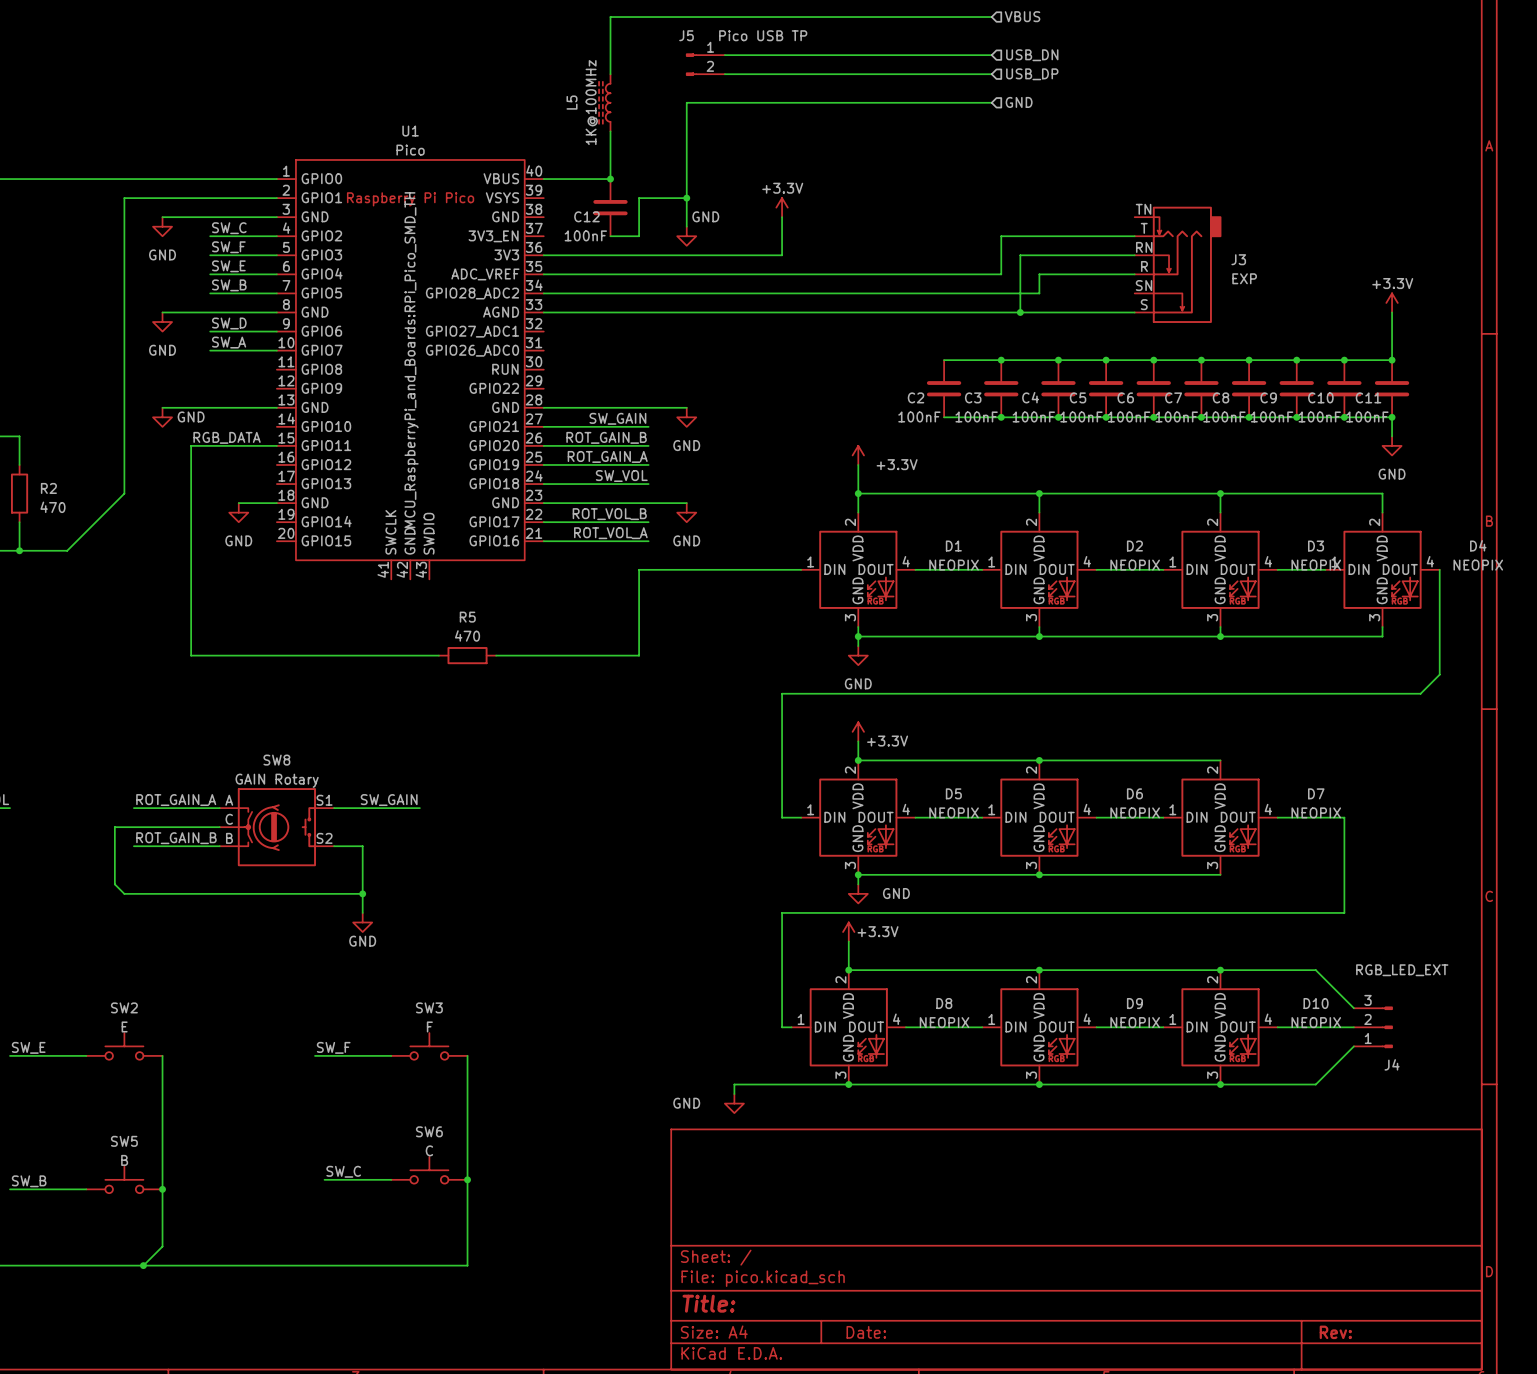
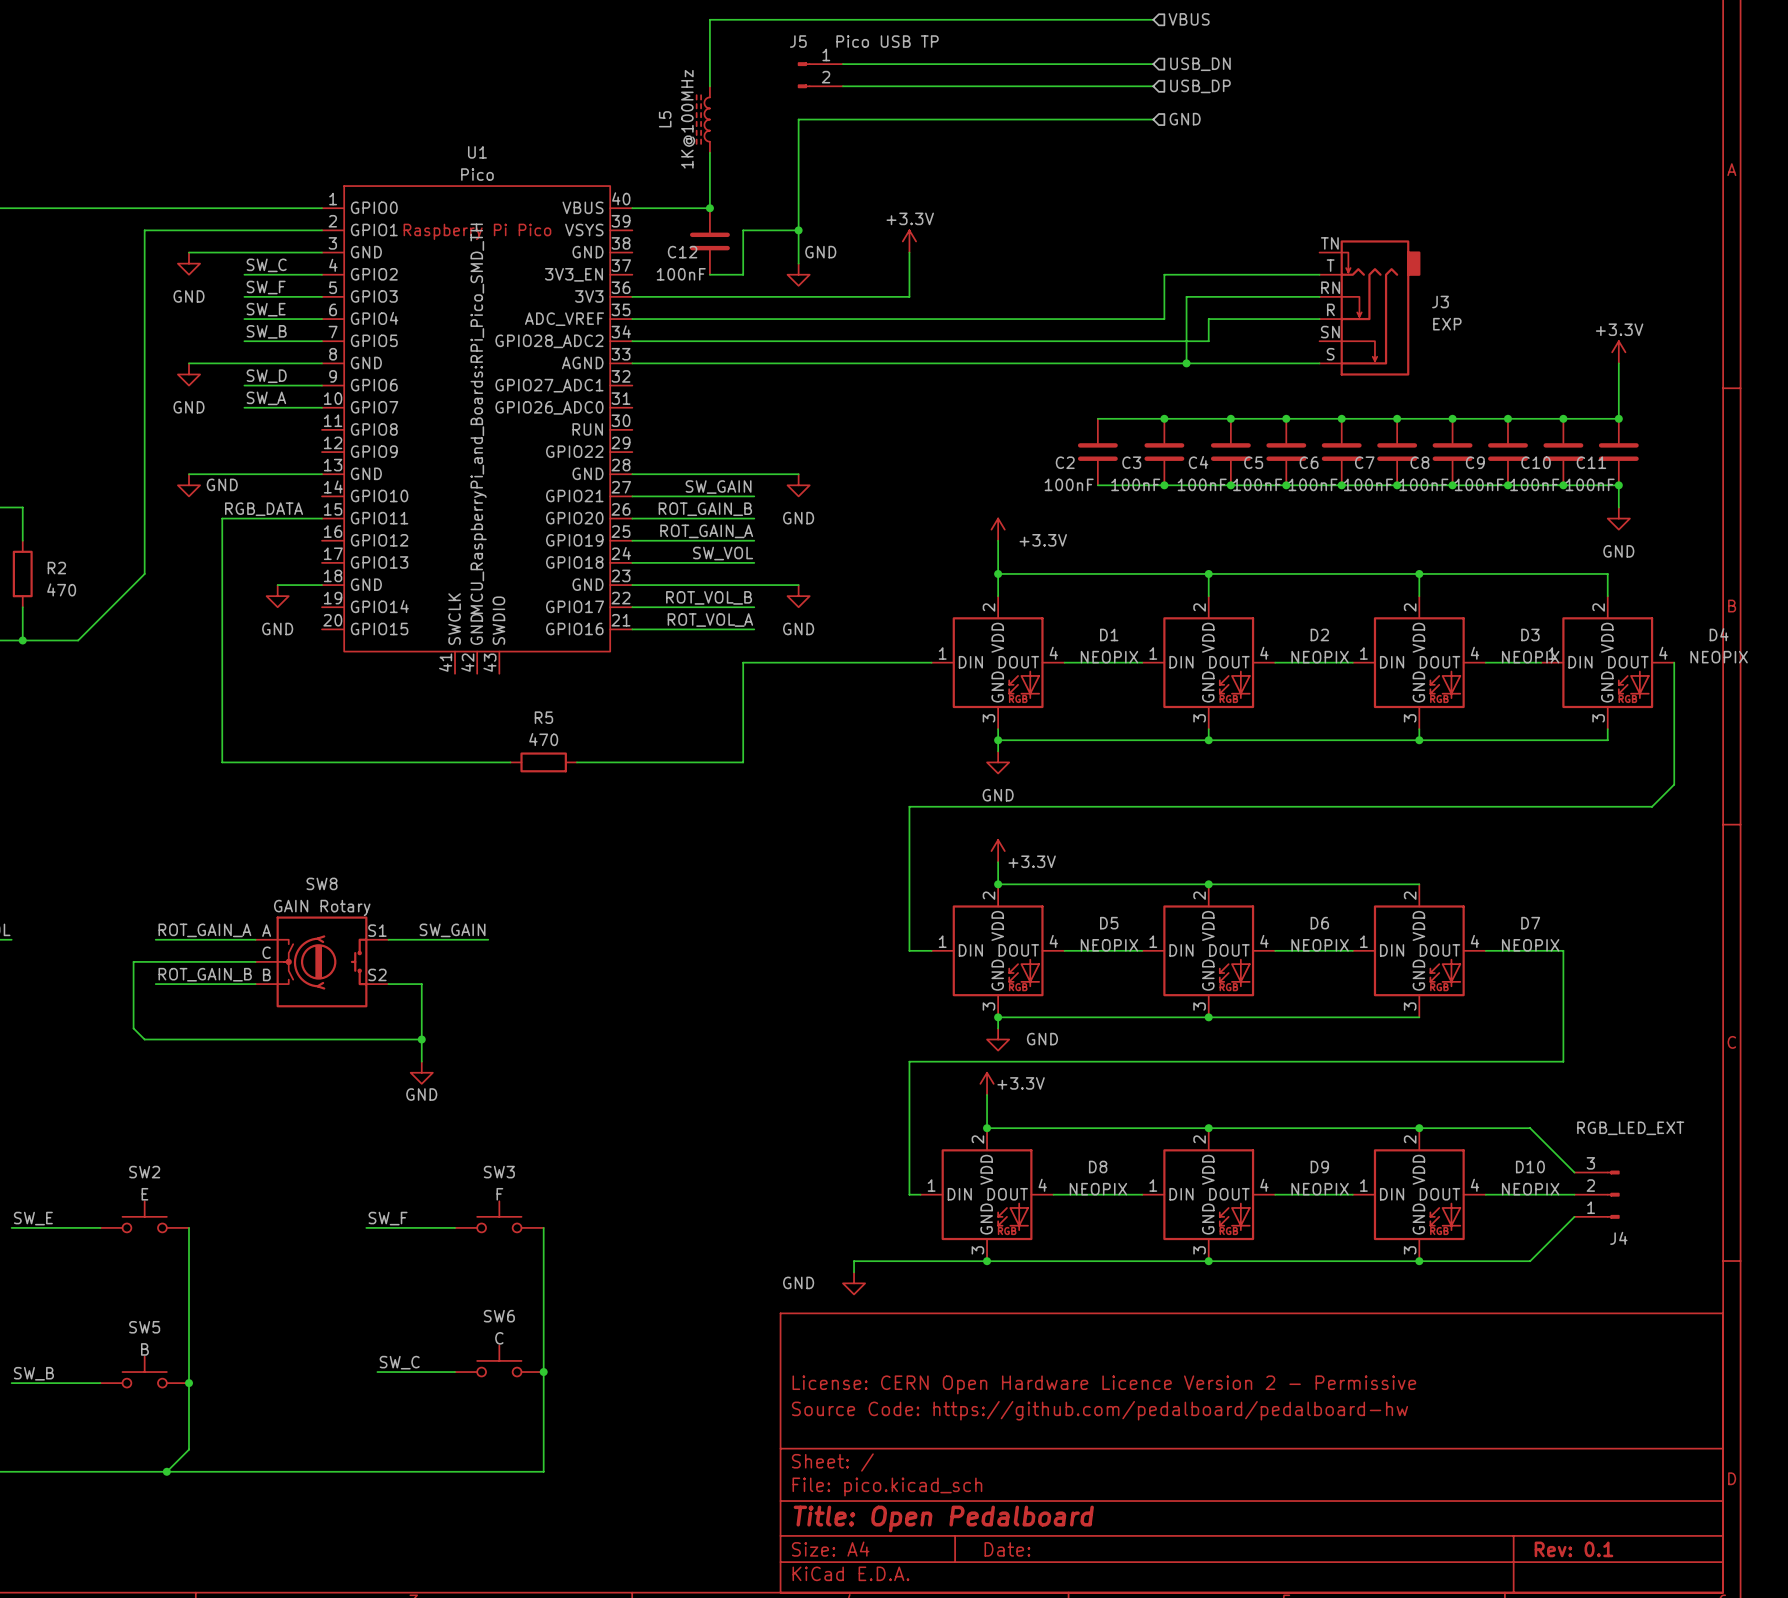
title block: none -> License: CERN Open Hardware Licence Version 2 - Permissive (1104, 1384)
title block: none -> Source Code: https://github.com/pedalboard/pedalboard-hw (1099, 1410)
title block: Title: (708, 1303) -> Title: Open Pedalboard (943, 1518)
title block: Rev: (1335, 1332) -> Rev: 0.1 (1573, 1549)

